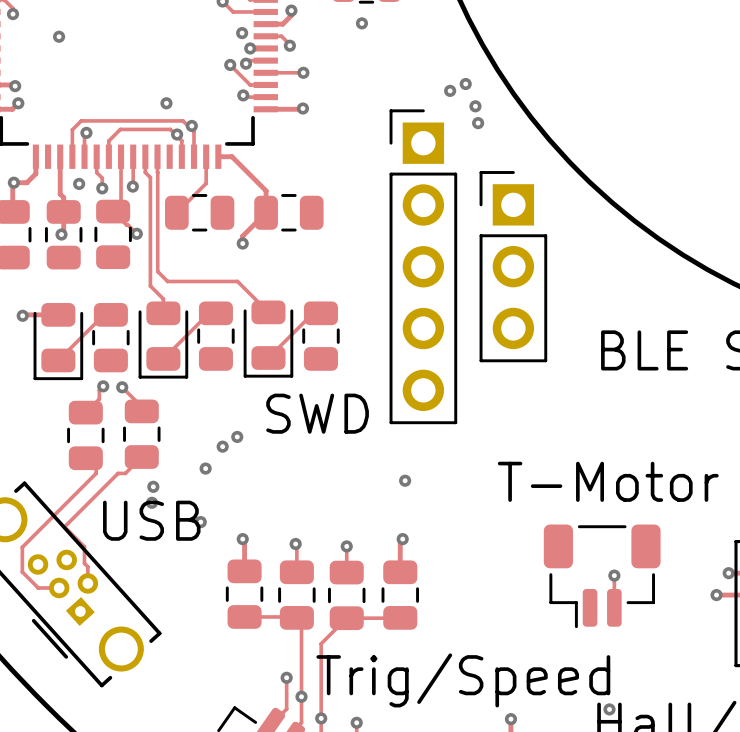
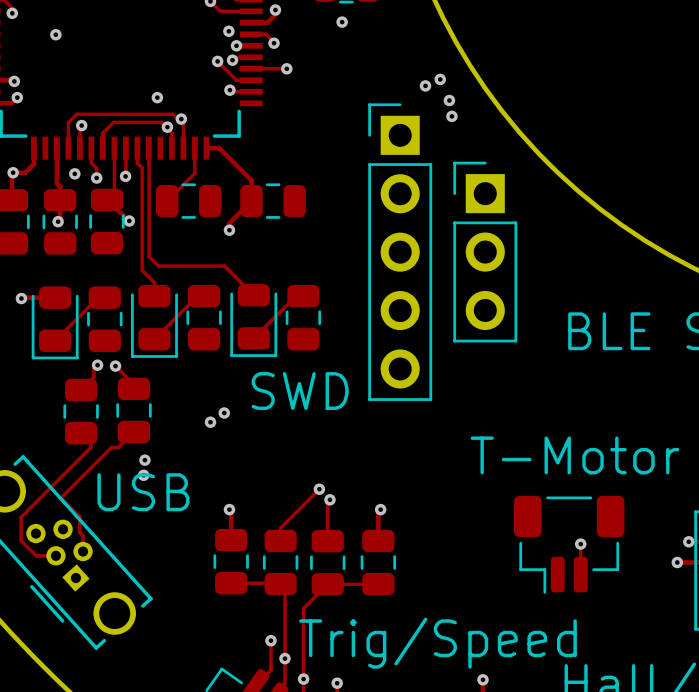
top track: (302, 108) (265, 109) -> none
via: (302, 108) -> none
via: (205, 468) -> none
via: (405, 480) -> none
via: none -> (319, 489)
via: (200, 522) -> none
top track: none -> (329, 499) (327, 501) (327, 516)
via: none -> (329, 499)
top track: (295, 543) (296, 558) -> (319, 489) (280, 528)
via: (295, 543) -> none
via: (346, 546) -> none
via: (609, 709) -> none

